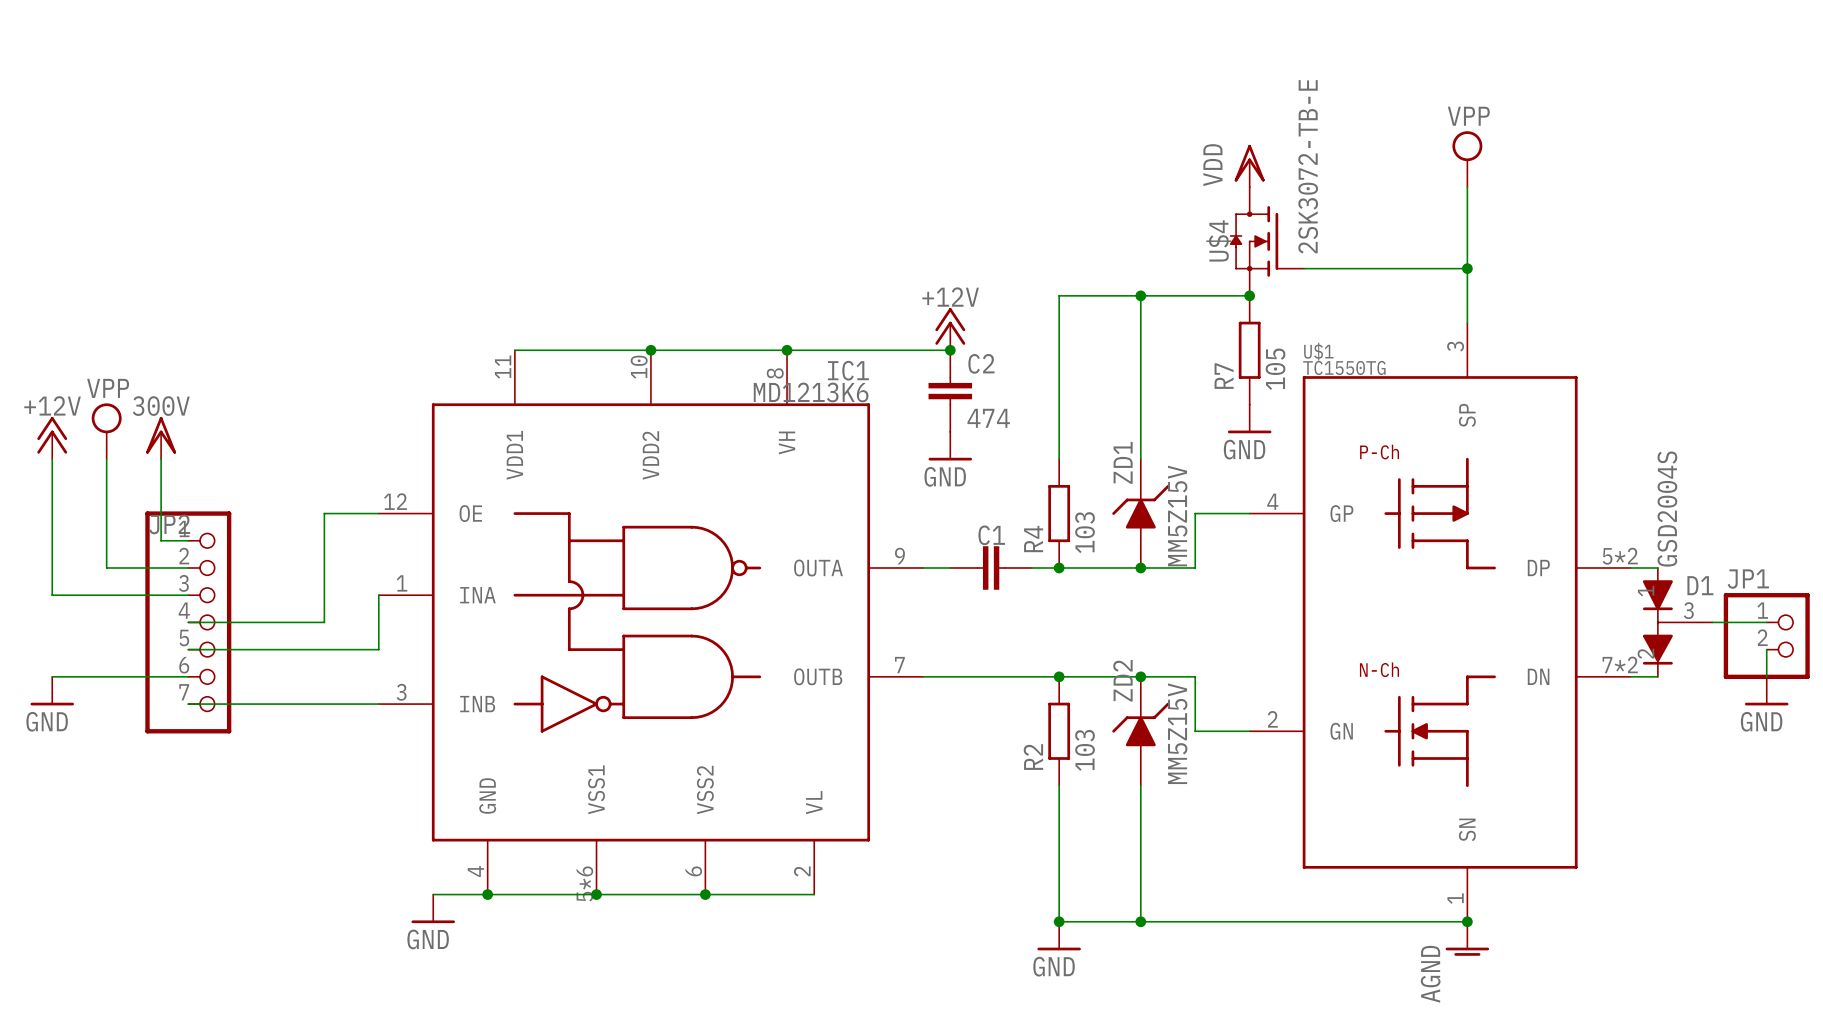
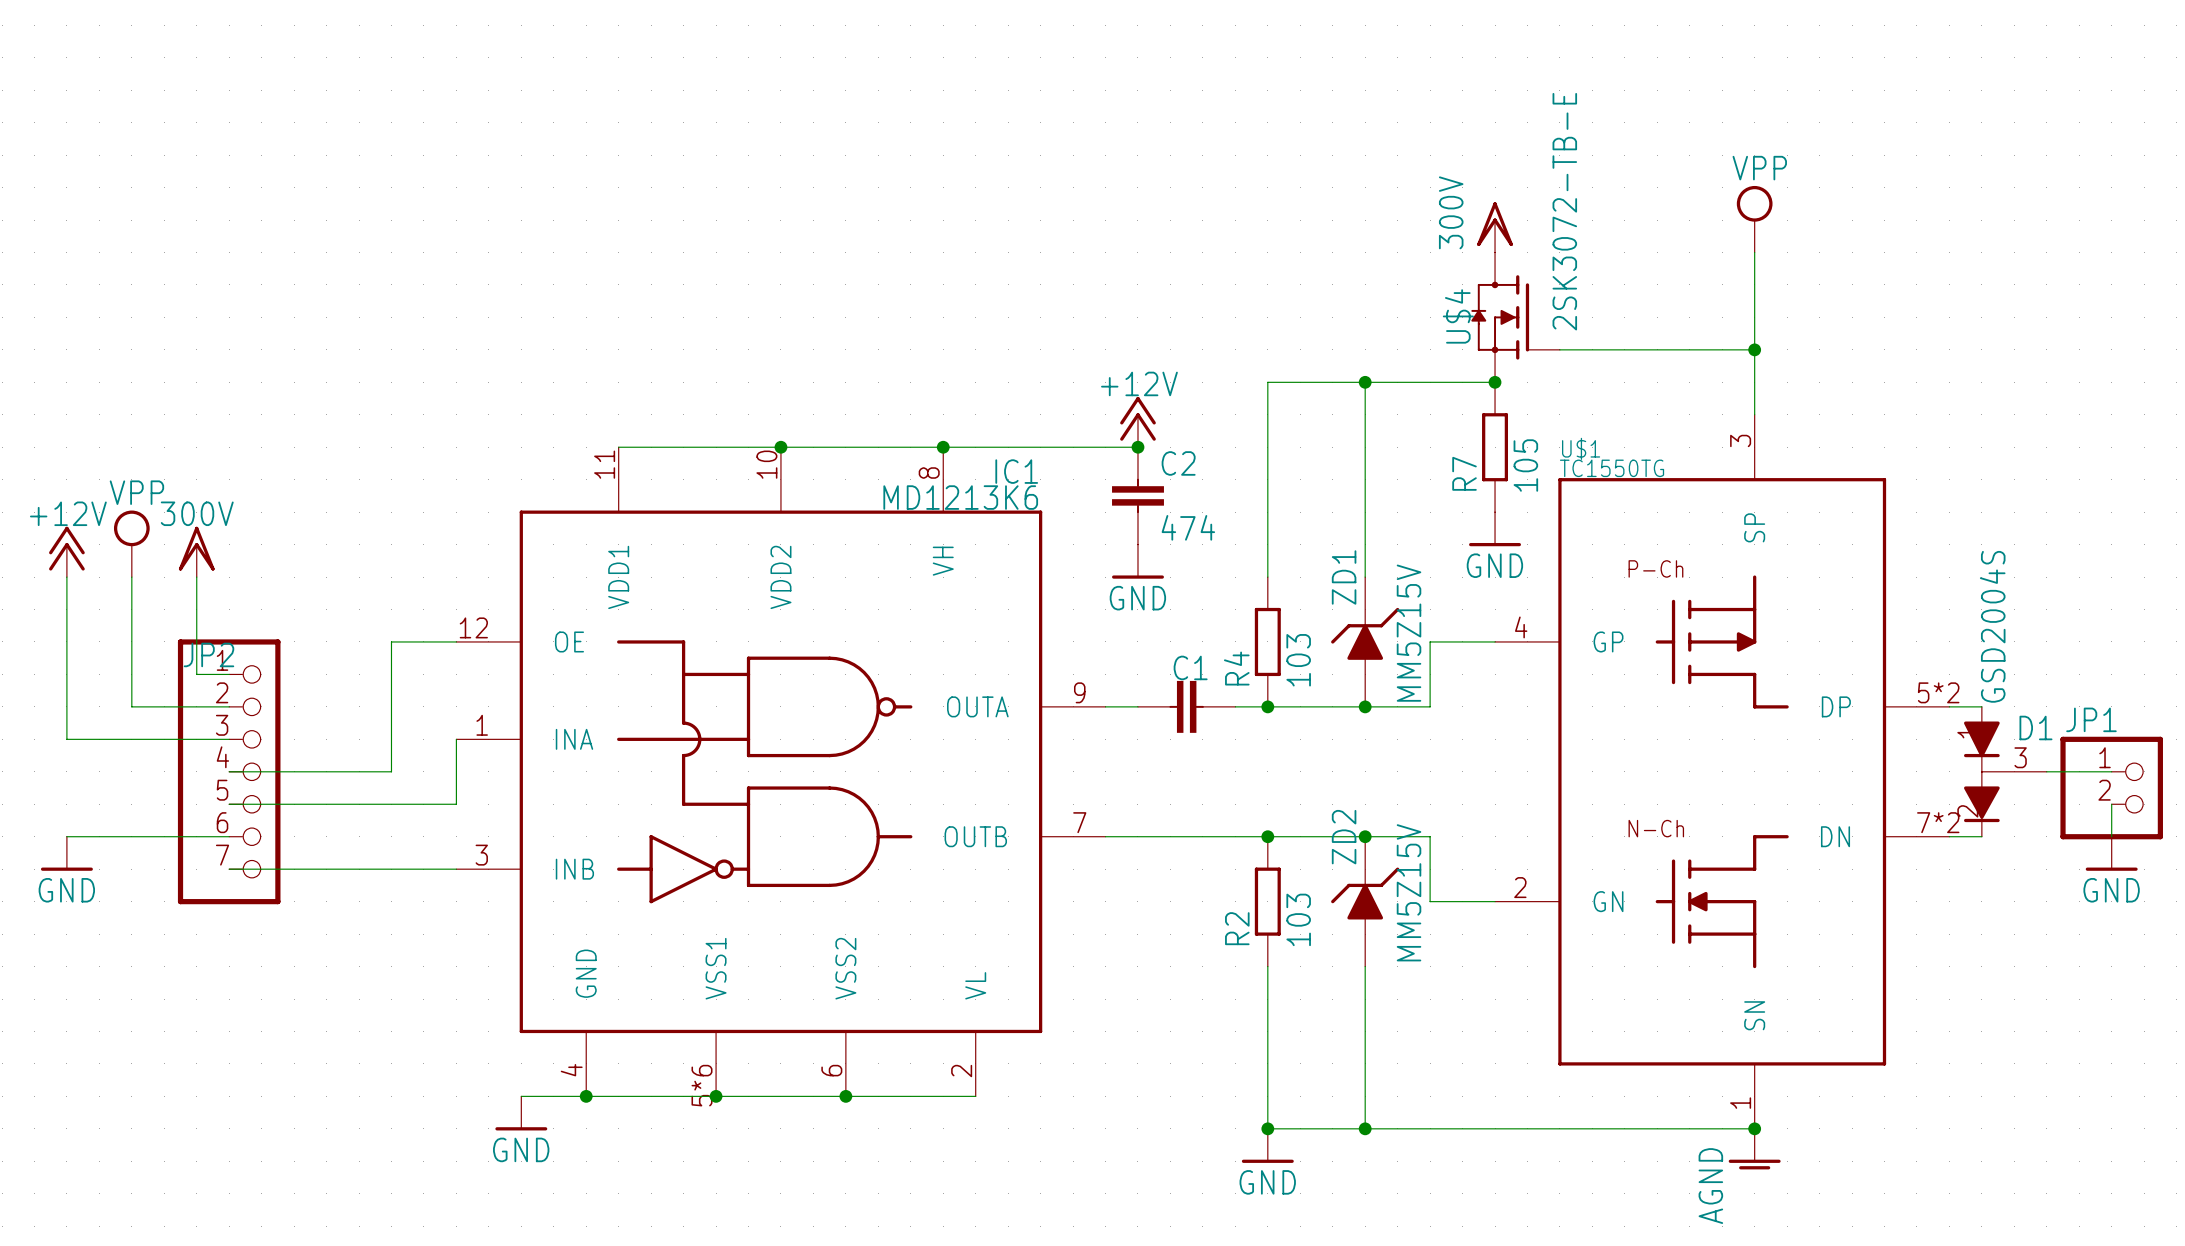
power symbol: VDD (1249, 165) -> 300V (1495, 227)

